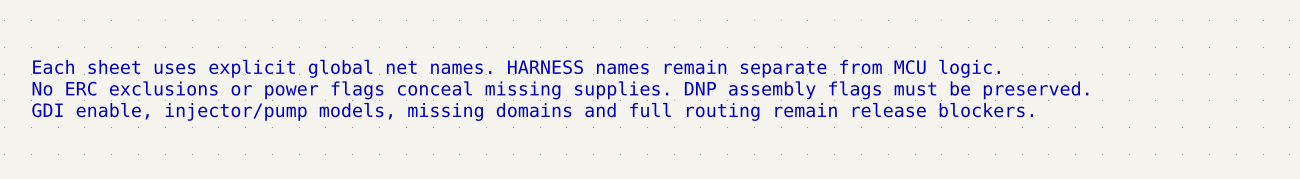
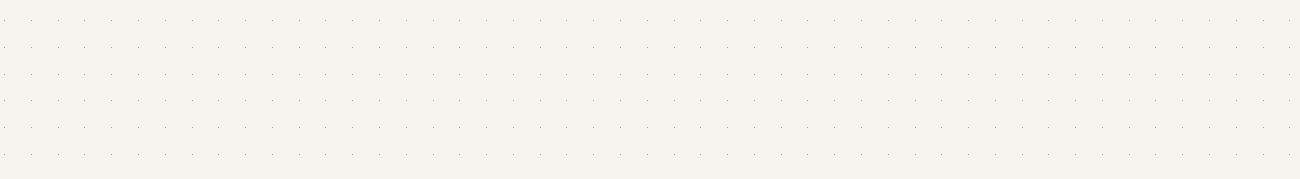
text: Each sheet uses explicit global net names. HARNESS names remain separate from MCU logic. (516, 68) -> none
text: No ERC exclusions or power flags conceal missing supplies. DNP assembly flags must be preserved. (560, 90) -> none
text: GDI enable, injector/pump models, missing domains and full routing remain release blockers. (532, 111) -> none

